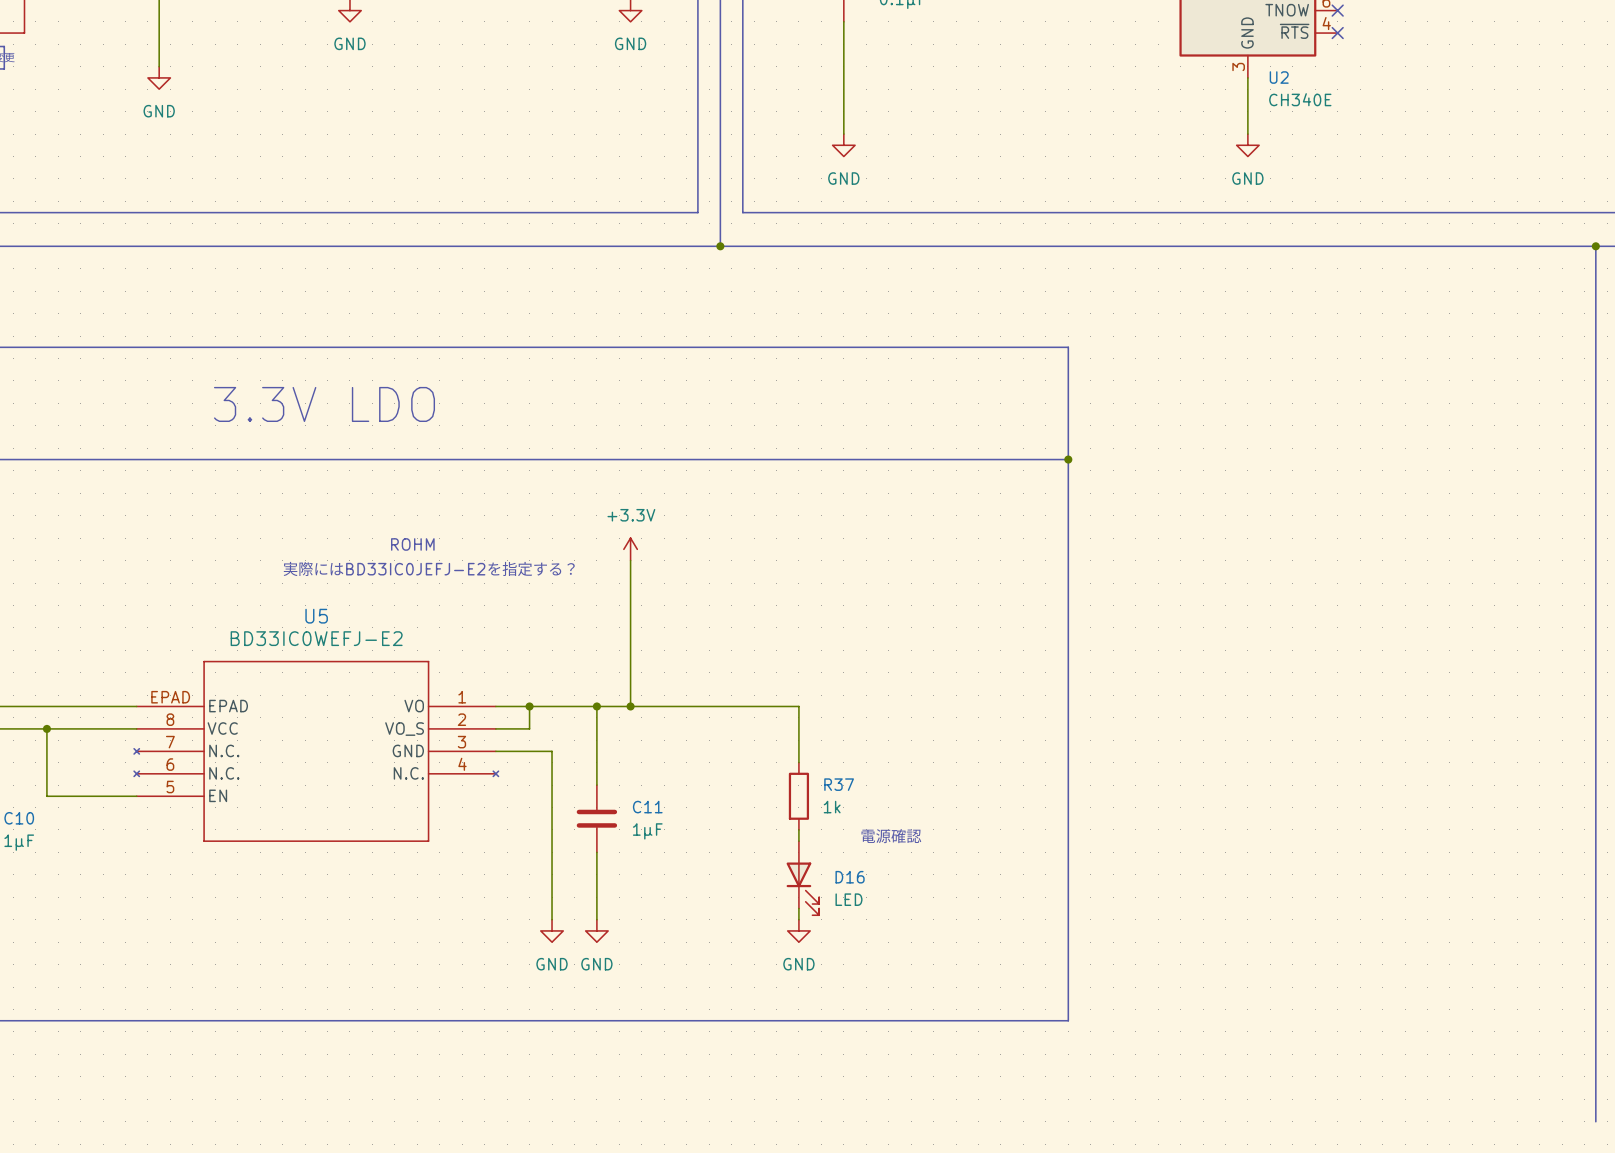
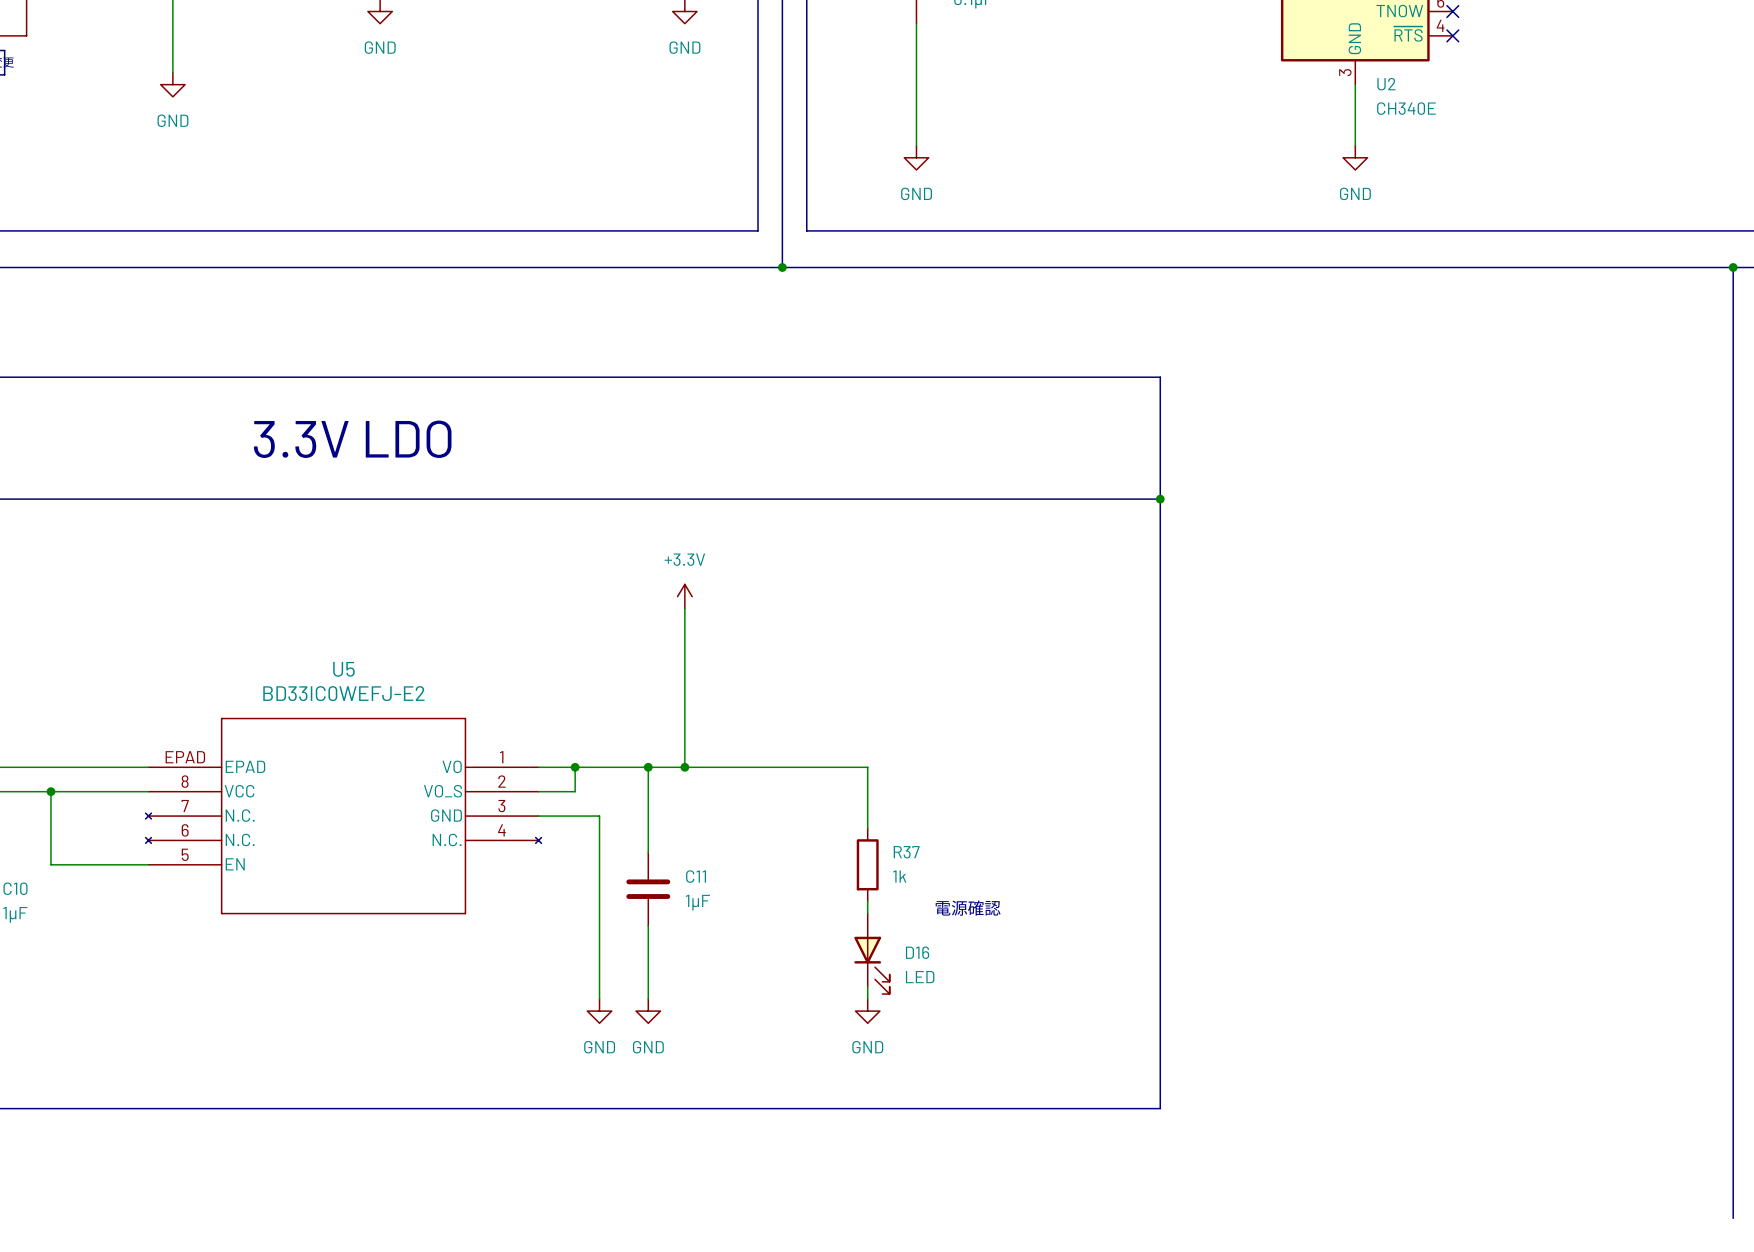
text: ROHM (412, 544) -> none
text: 実際にはBD33IC0JEFJ-E2を指定する？ (429, 568) -> none

